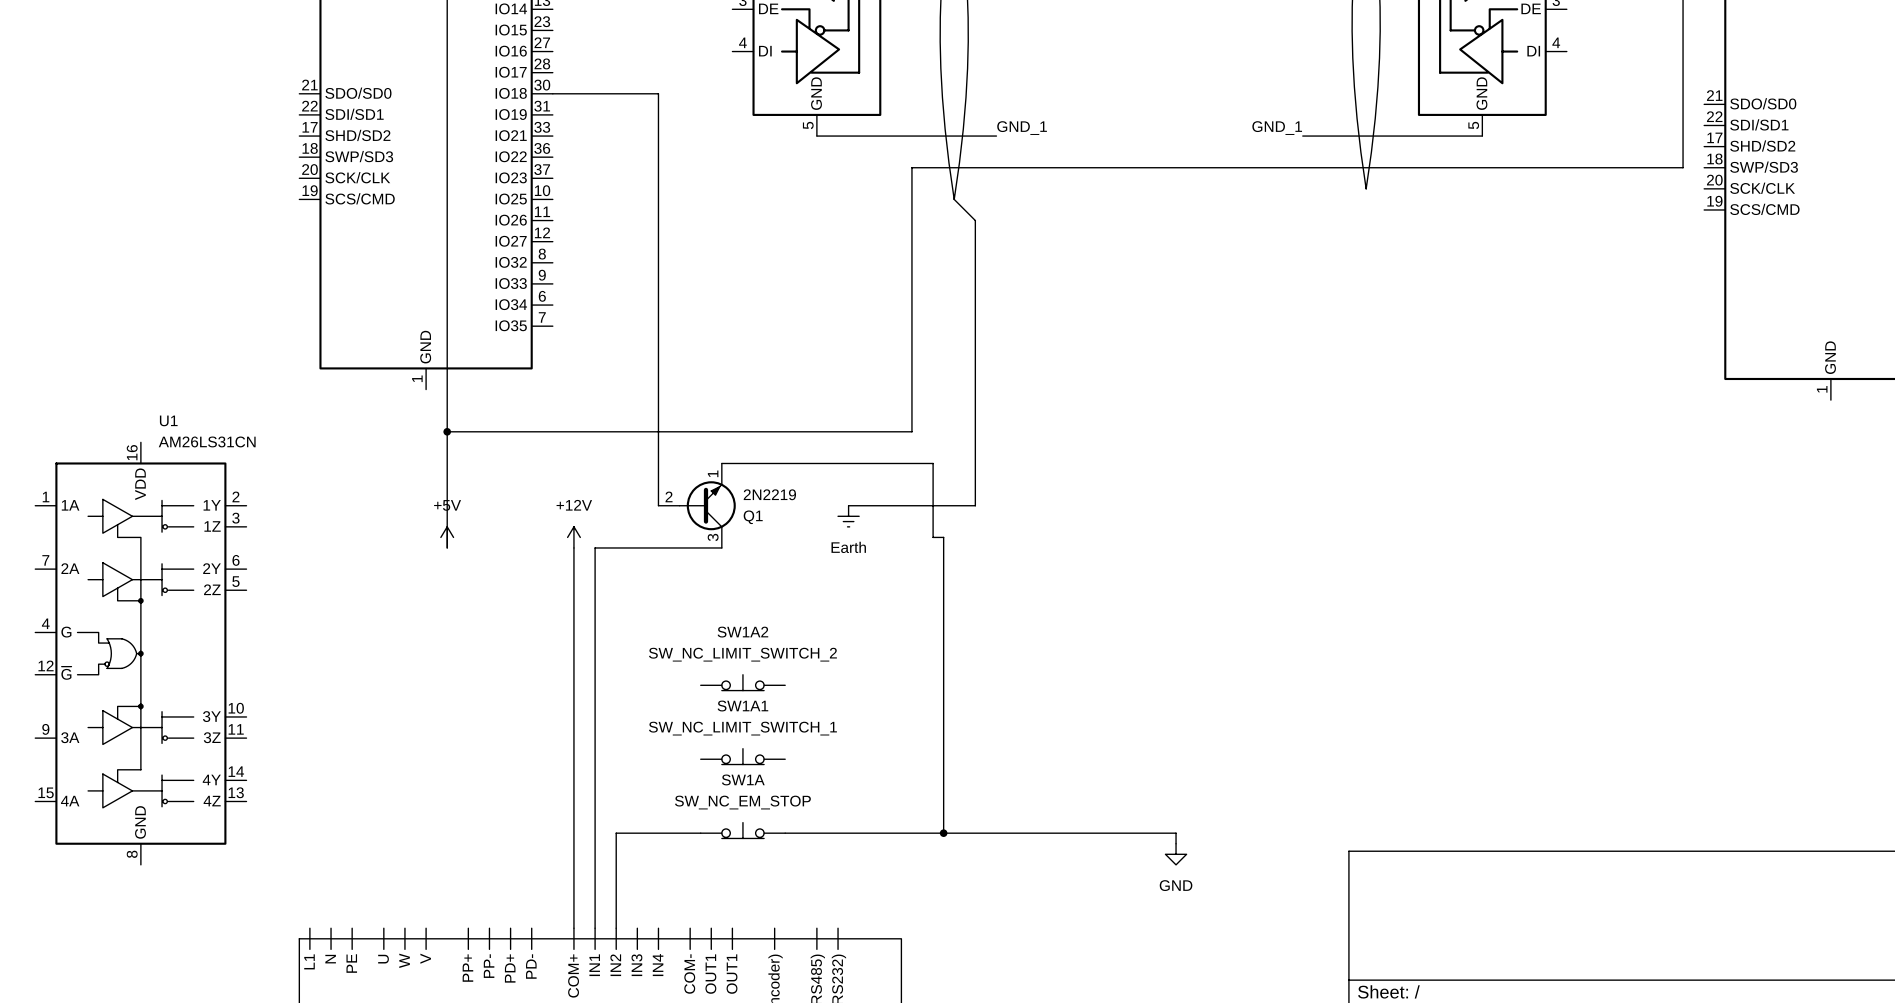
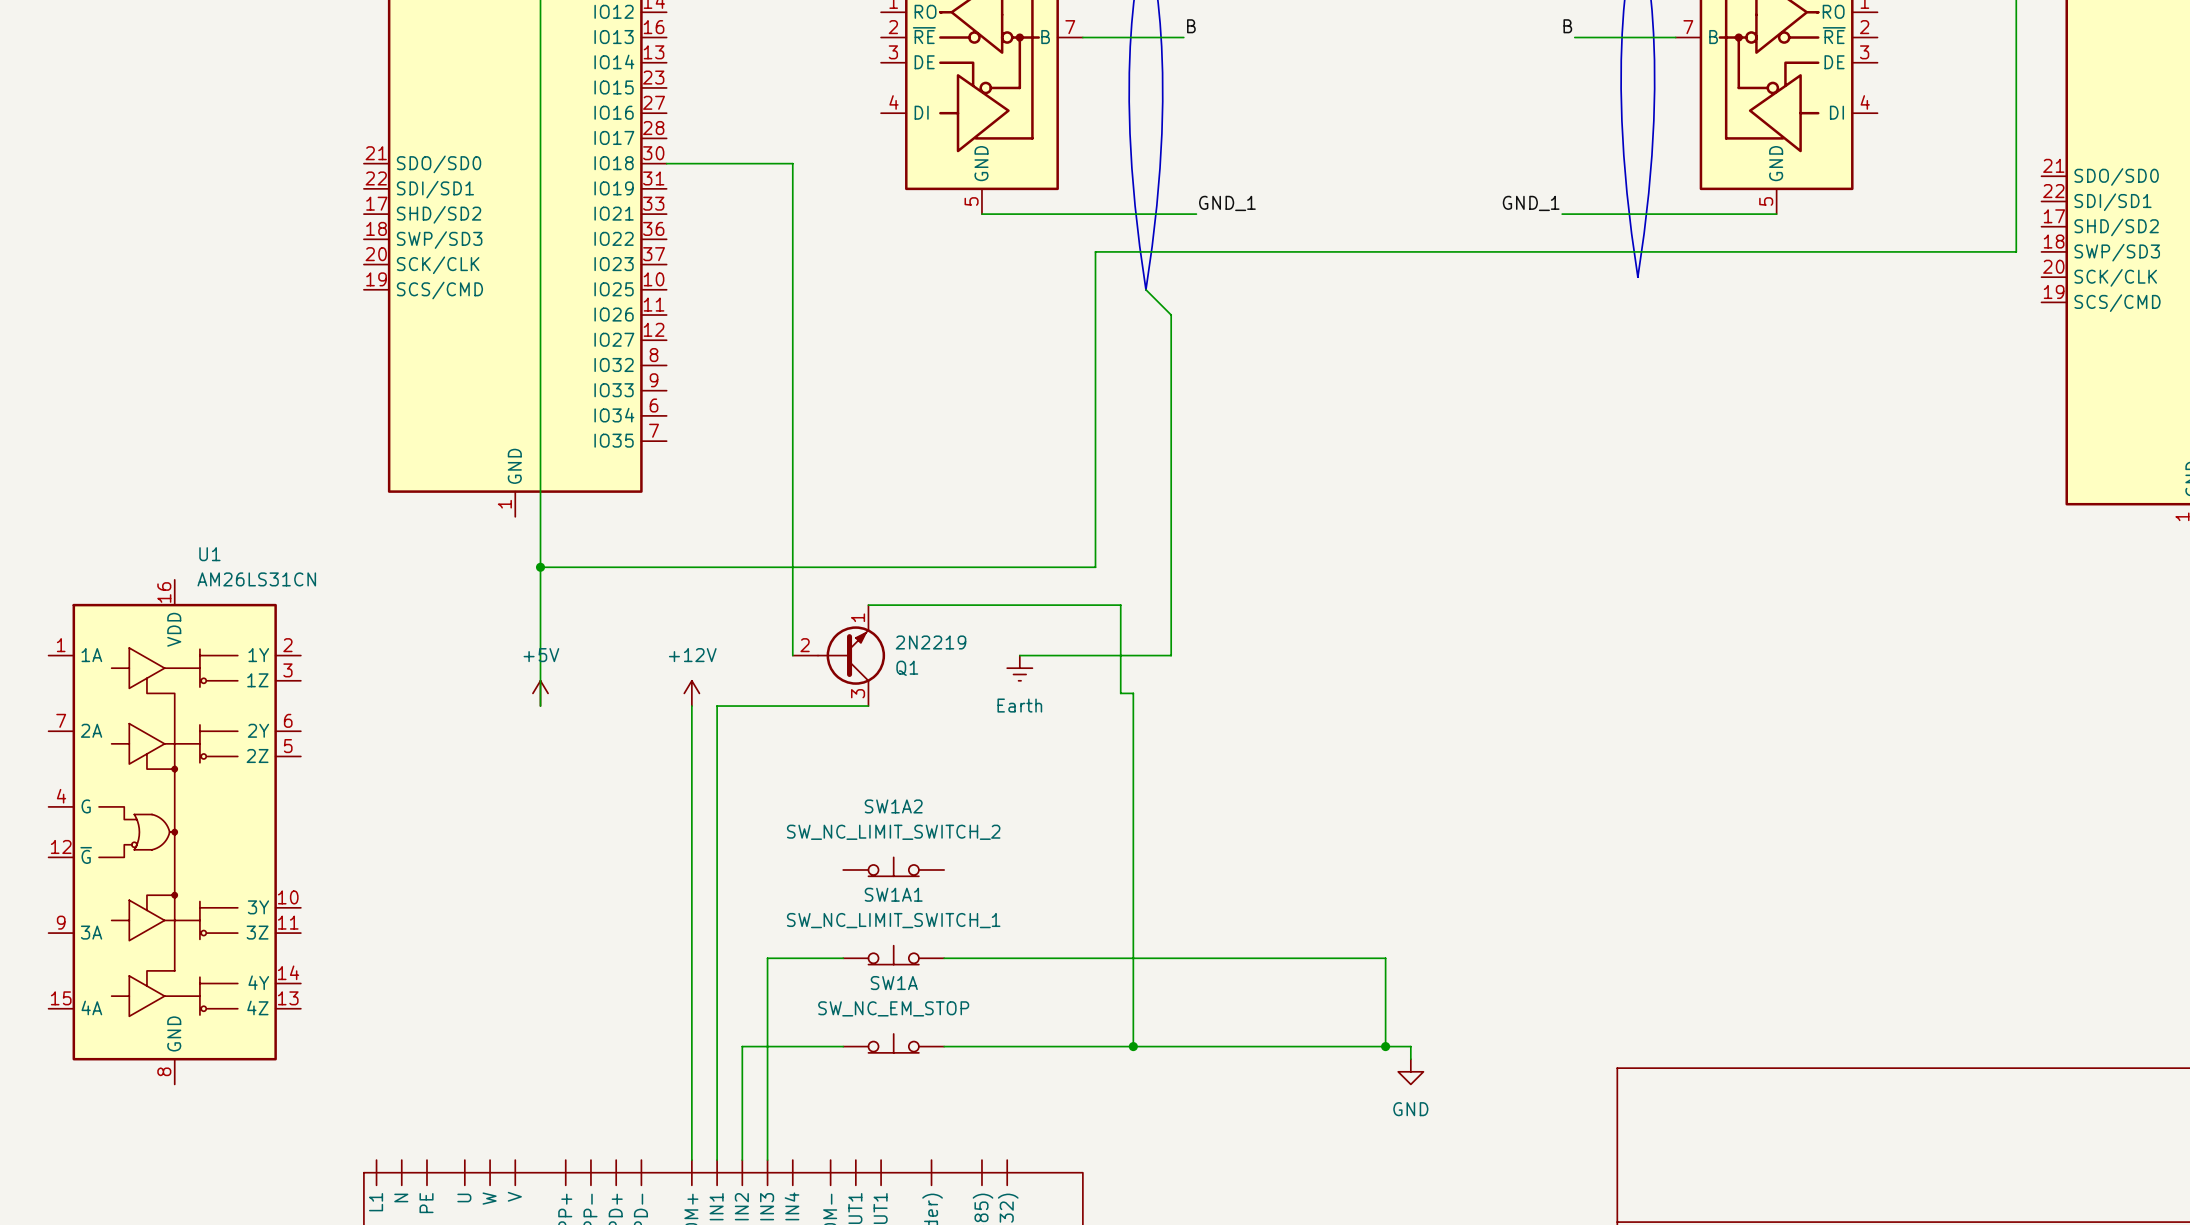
wire: none -> (843, 958) (767, 958) (767, 1160)
wire: none -> (944, 958) (1385, 958) (1385, 1046)
junction: none -> (1385, 1046)

